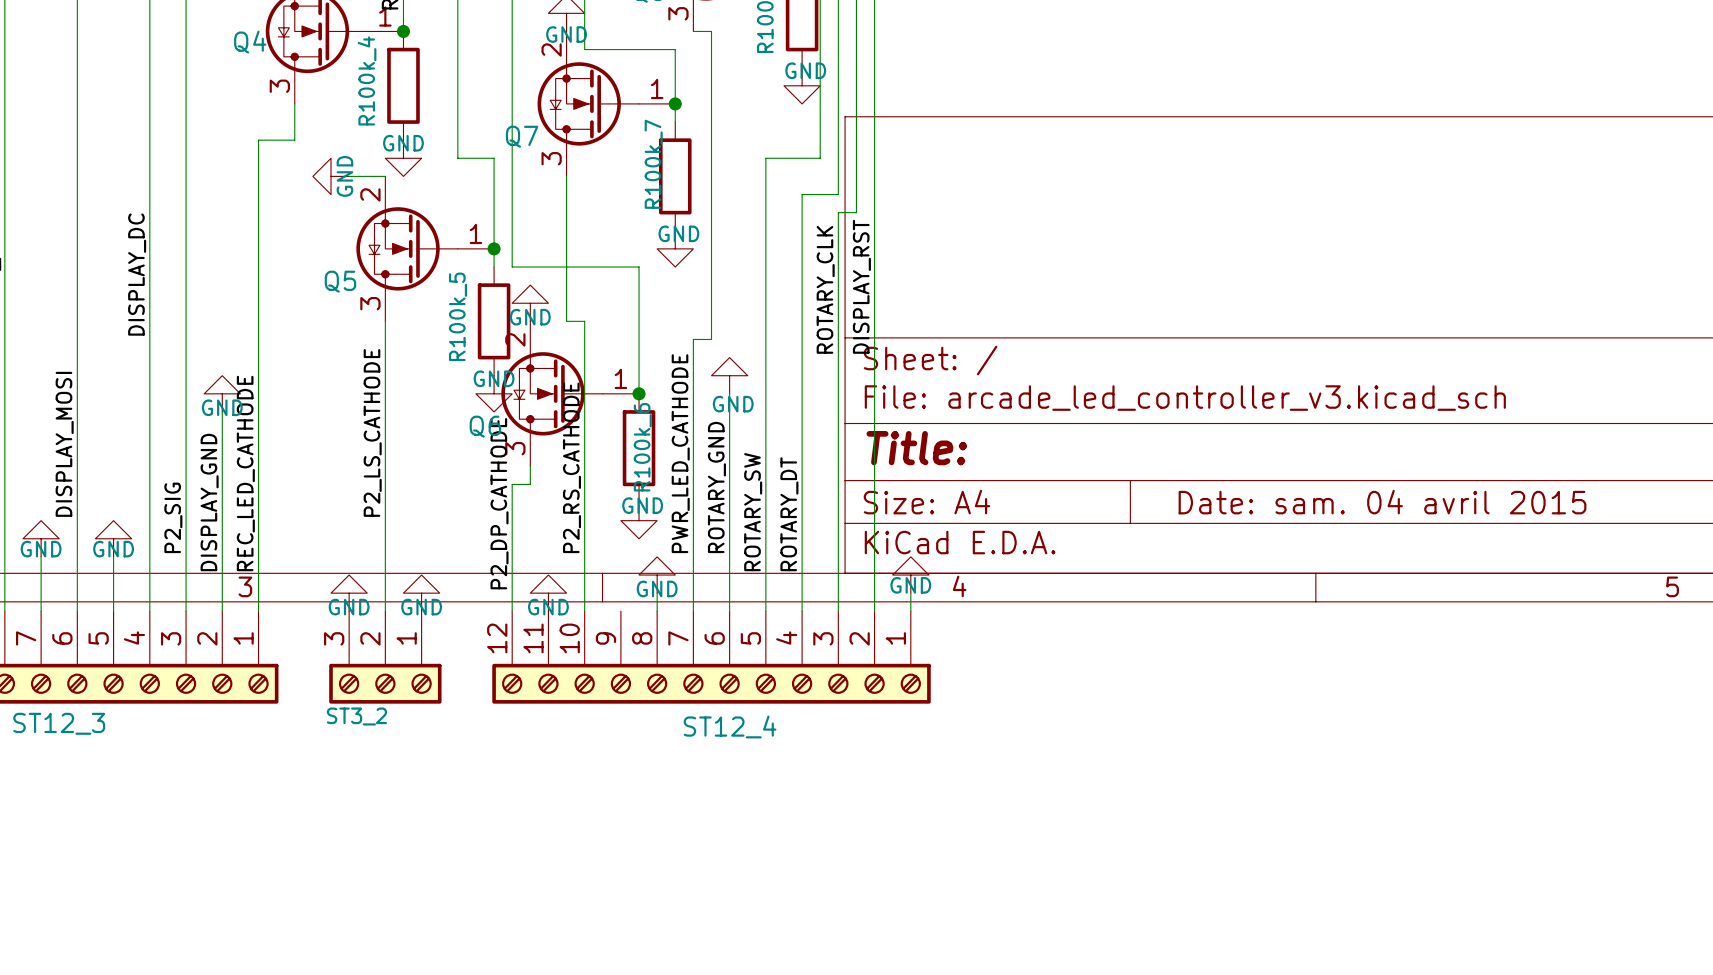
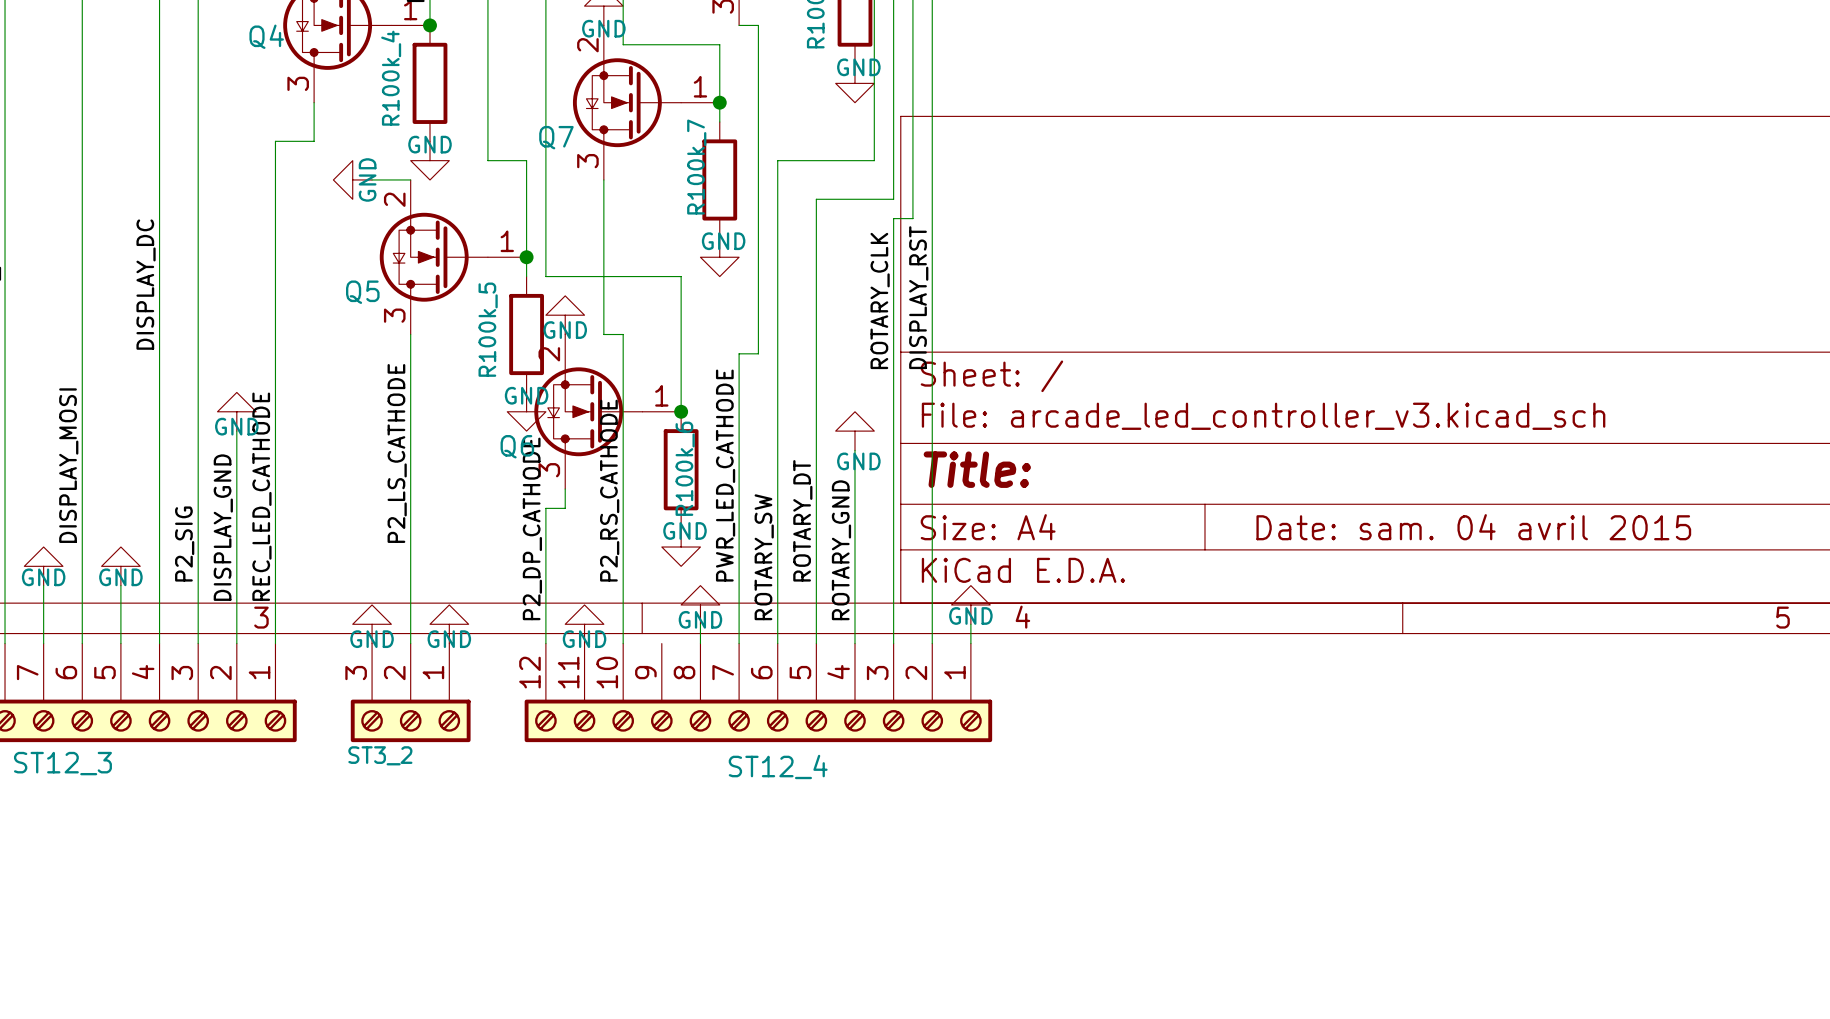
wire: (765, 158) (765, 194) -> (854, 199) (816, 199)
wire: none -> (816, 160) (777, 160) (777, 411)
wire: (802, 194) (802, 430) -> none
power symbol position: GND (729, 375) -> GND (854, 431)
label position: ROTARY_GND (716, 487) -> ROTARY_GND (841, 550)
label position: ROTARY_SW (753, 512) -> ROTARY_SW (764, 557)
label position: ROTARY_DT (789, 514) -> ROTARY_DT (802, 520)

